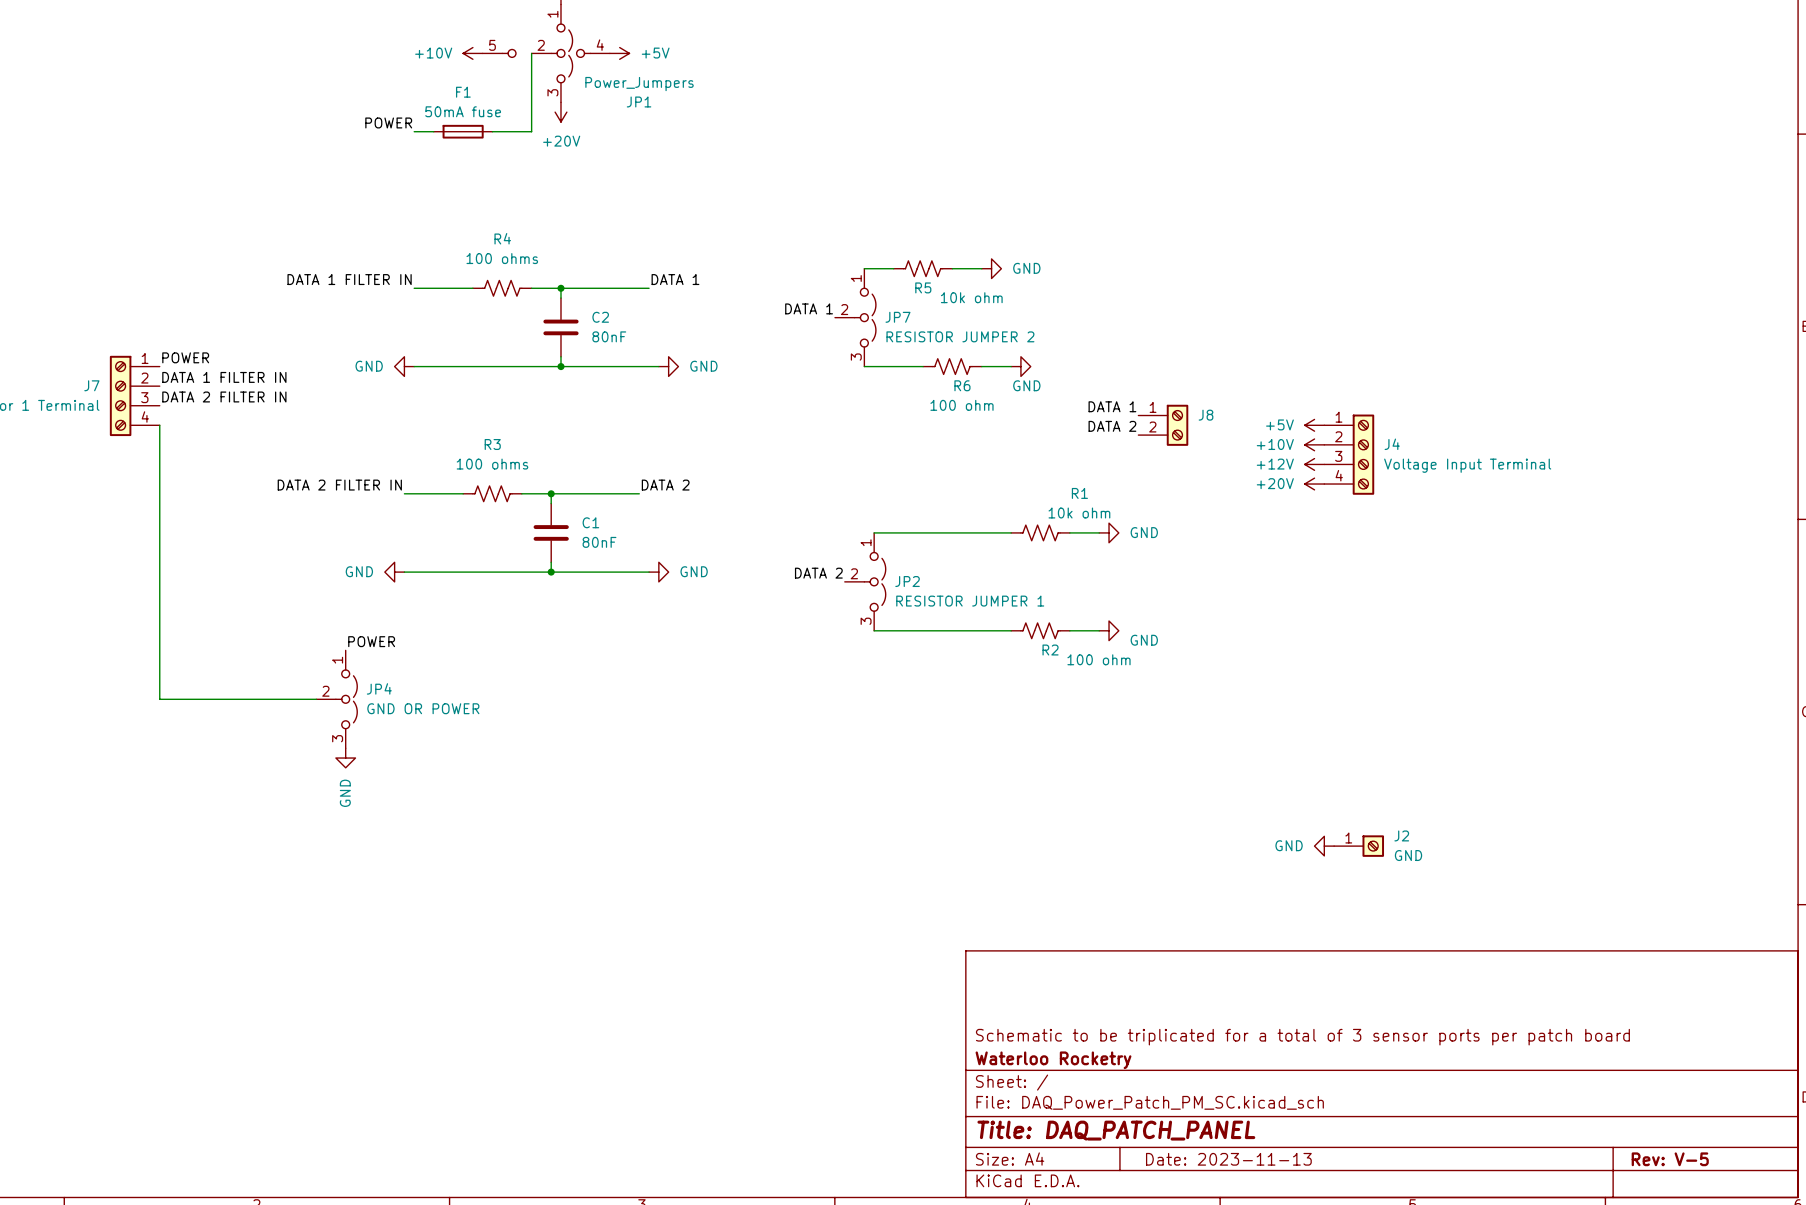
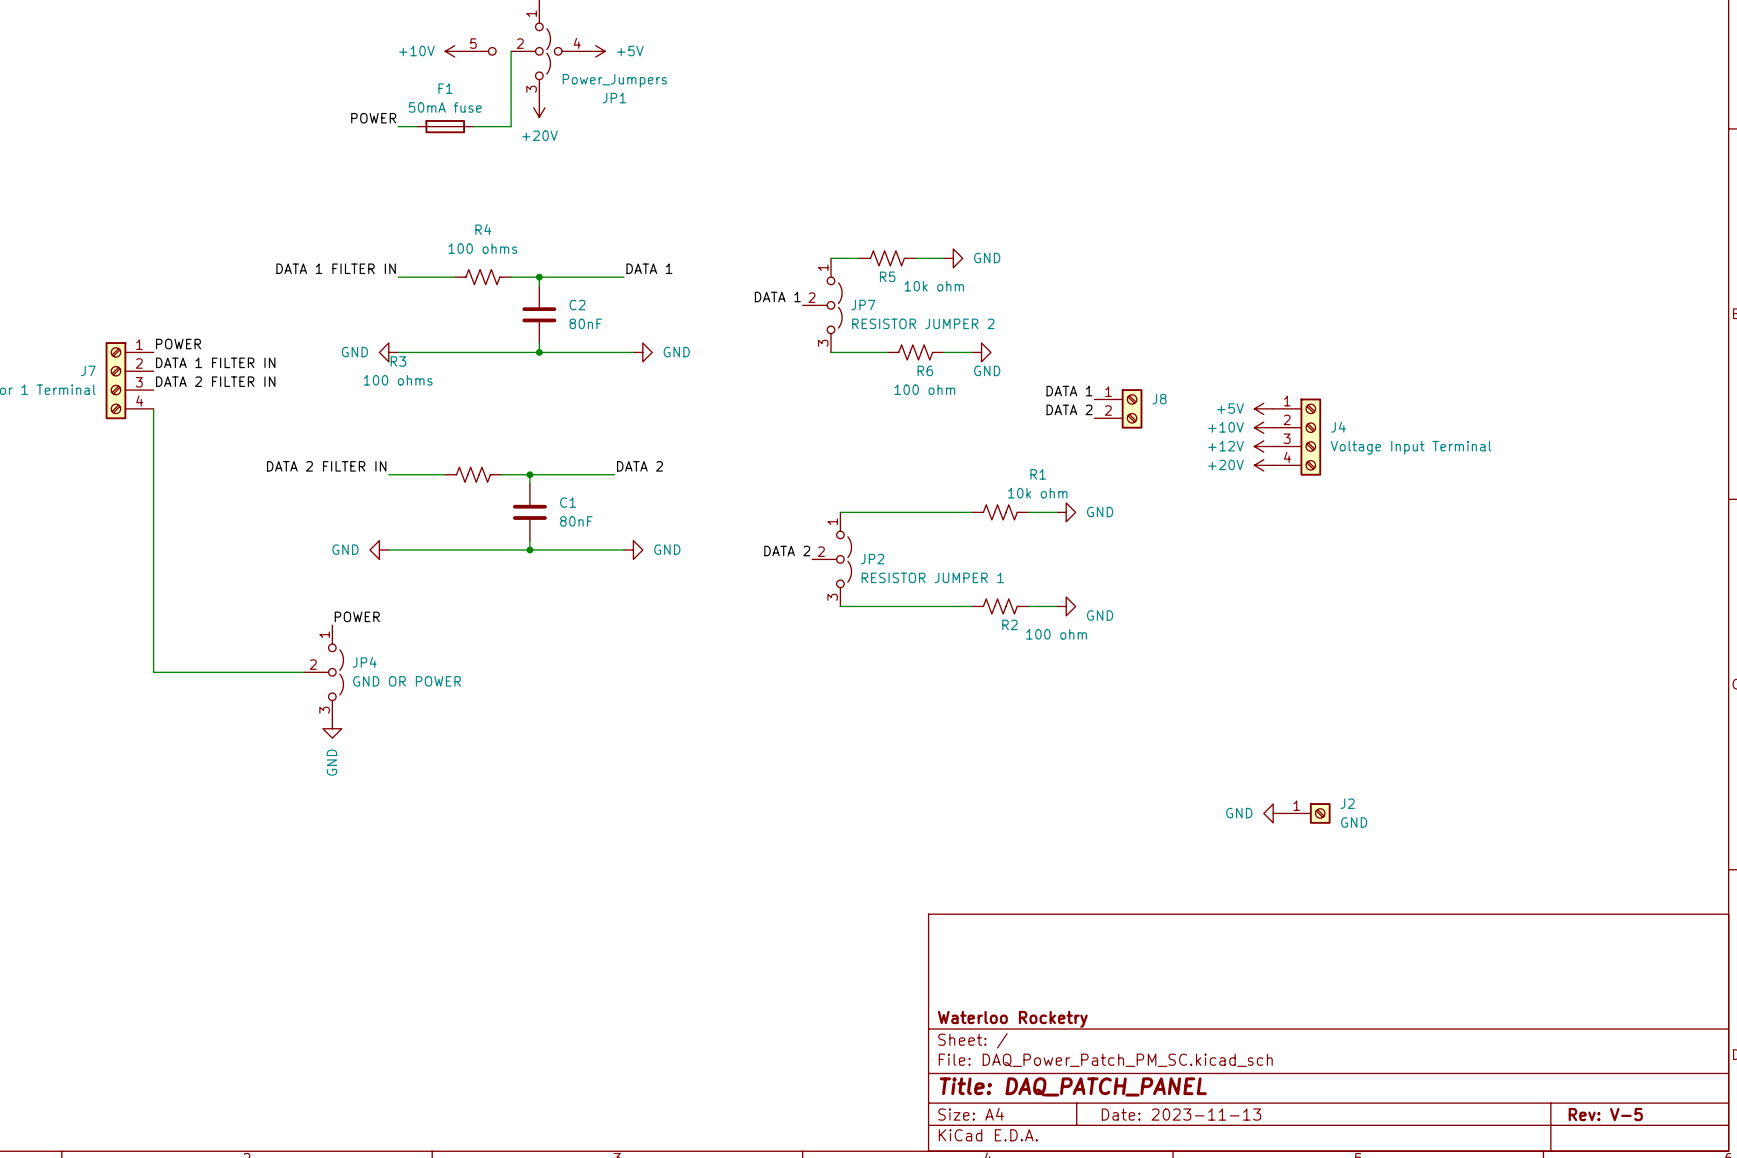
R3 name position: R3 (492, 444) -> R3 (398, 361)
R3 value position: 100 ohms (492, 464) -> 100 ohms (398, 380)
title block: Schematic to be triplicated for a total of 3 sensor ports per patch board (1302, 1037) -> none

